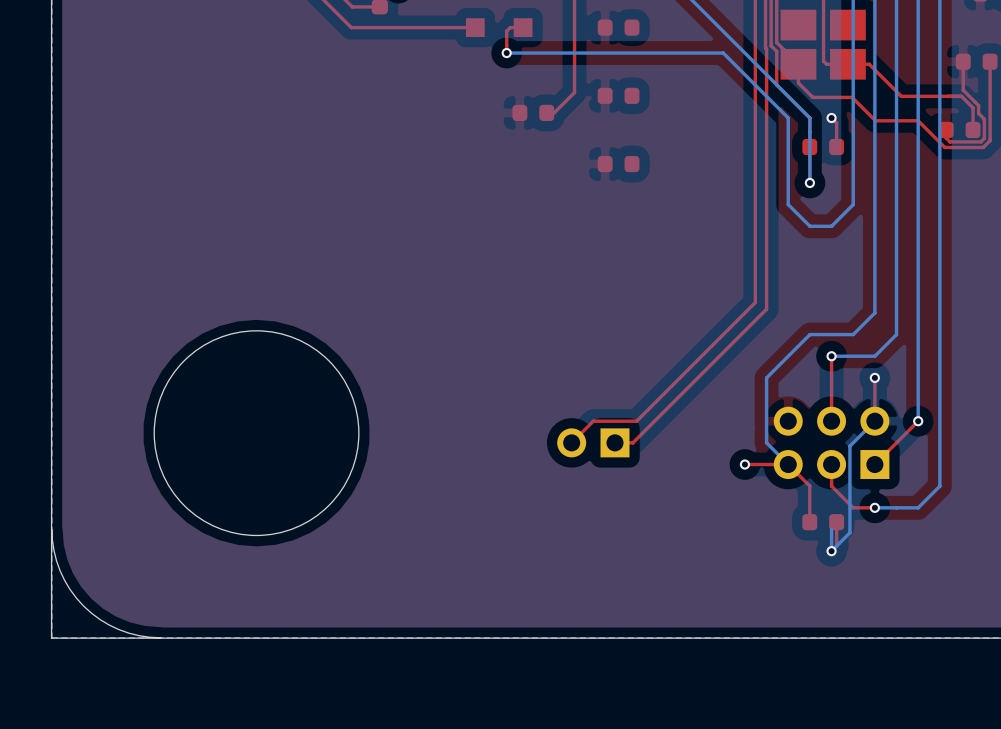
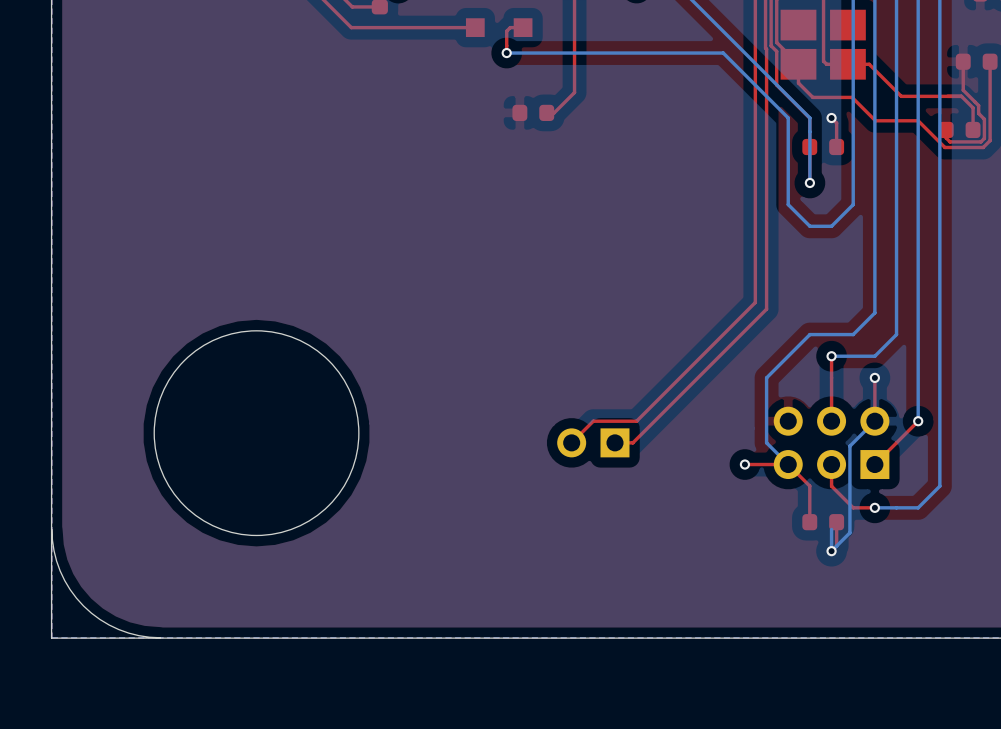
part: (618, 27) -> none
part: (618, 95) -> none
part: (618, 164) -> none

